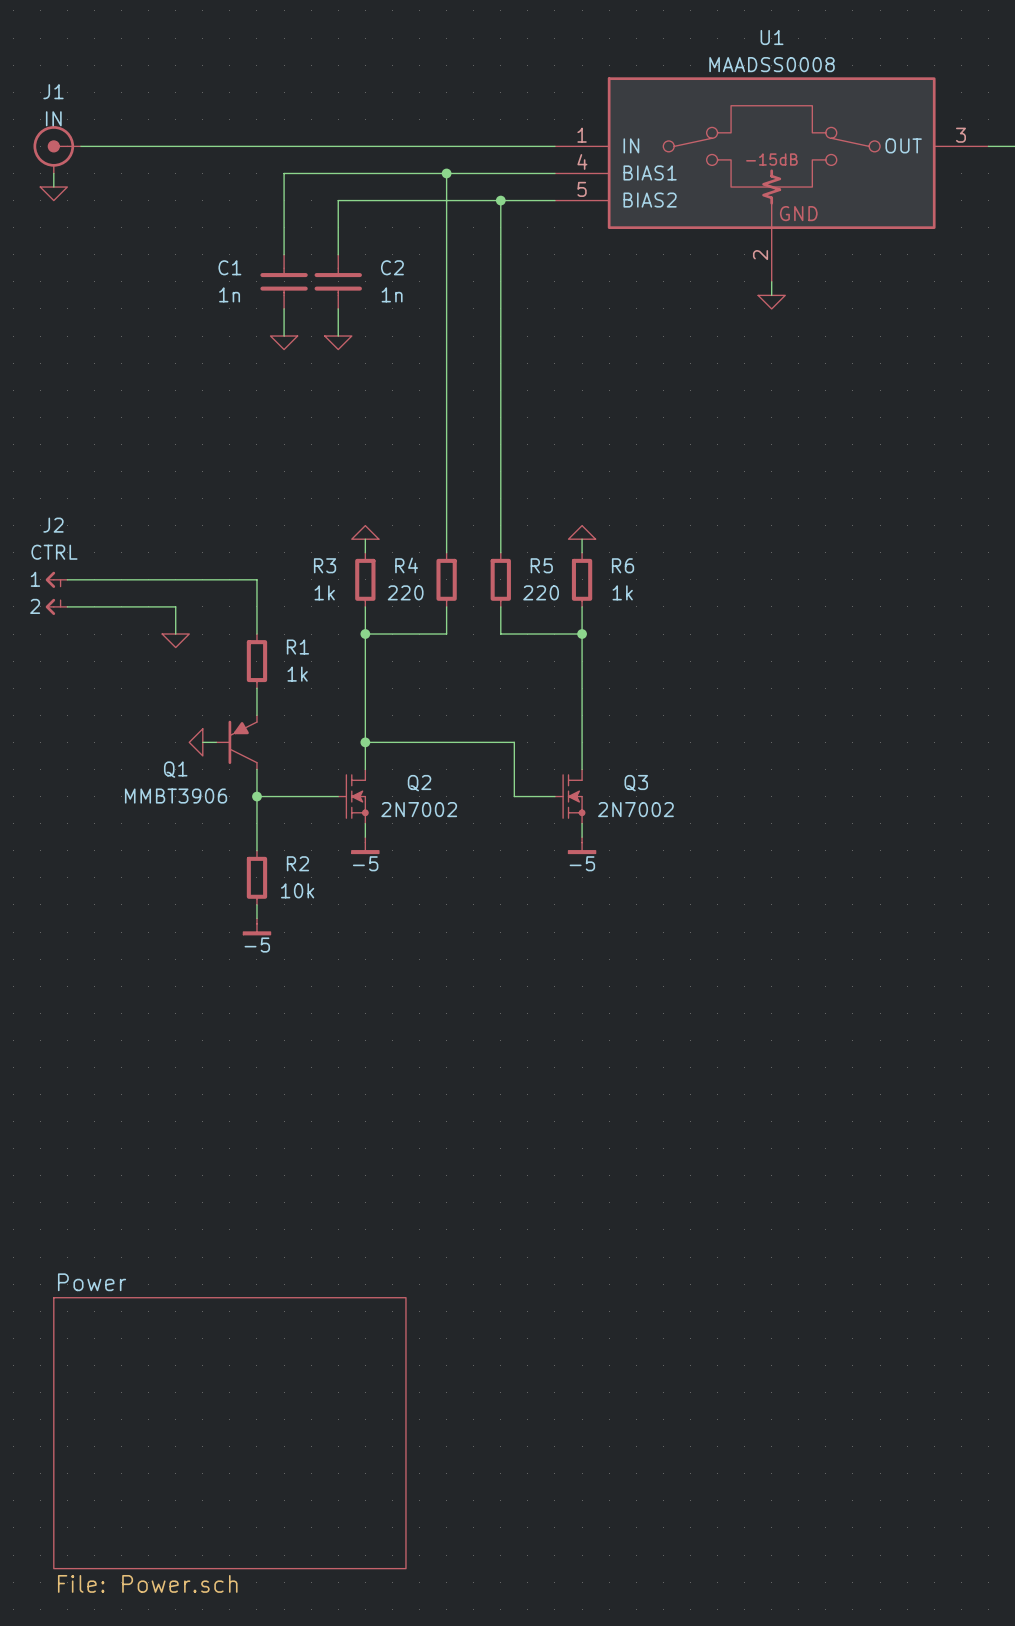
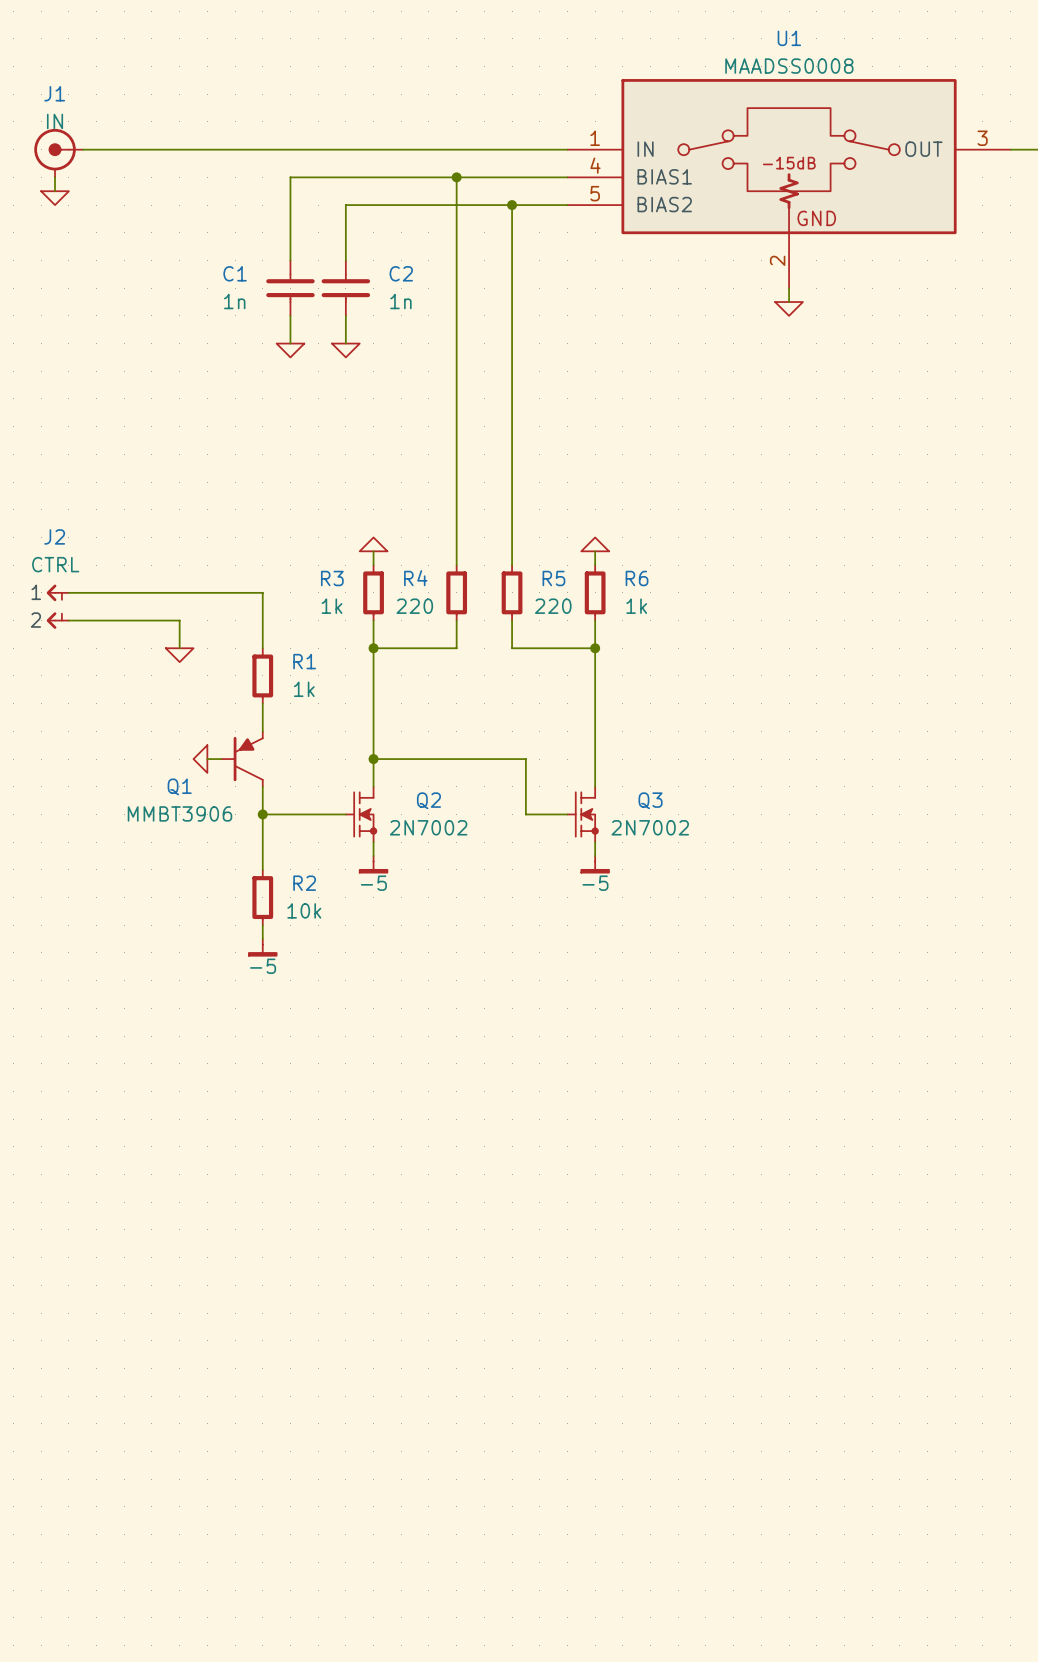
sheet Power: File: Power.sch (229, 1433) -> none

